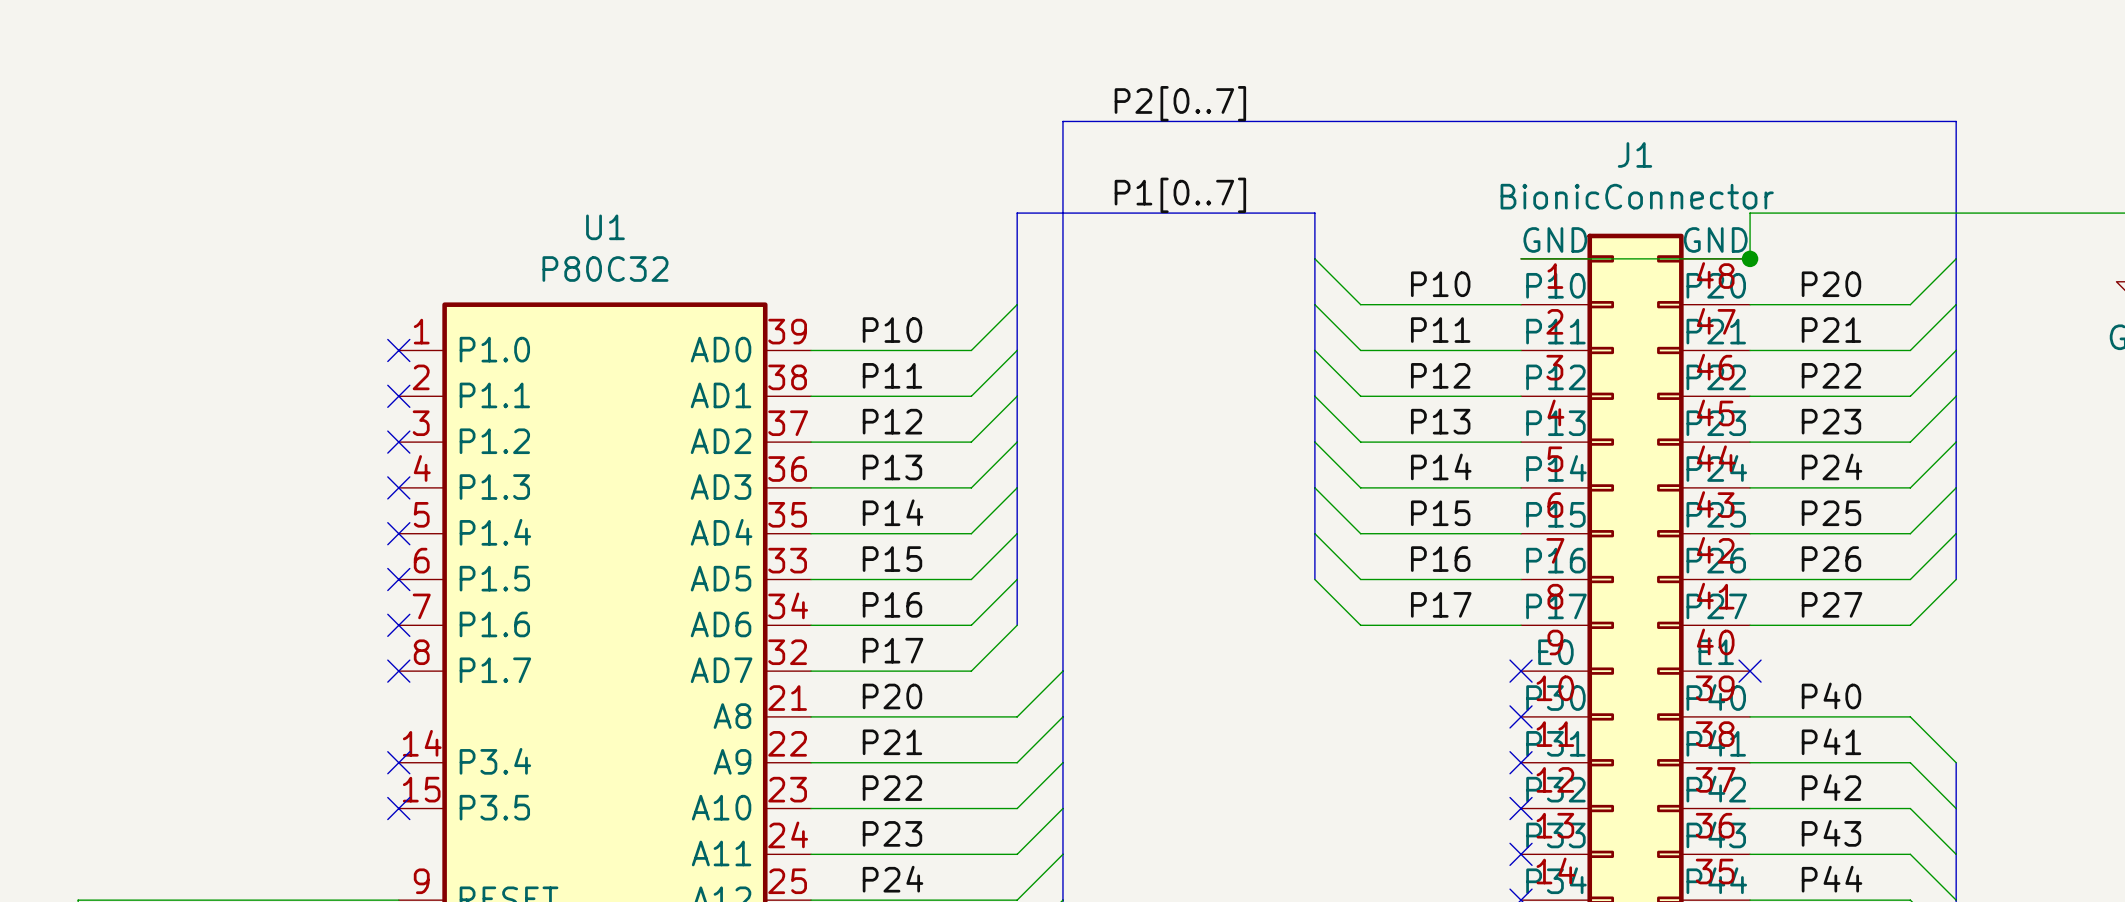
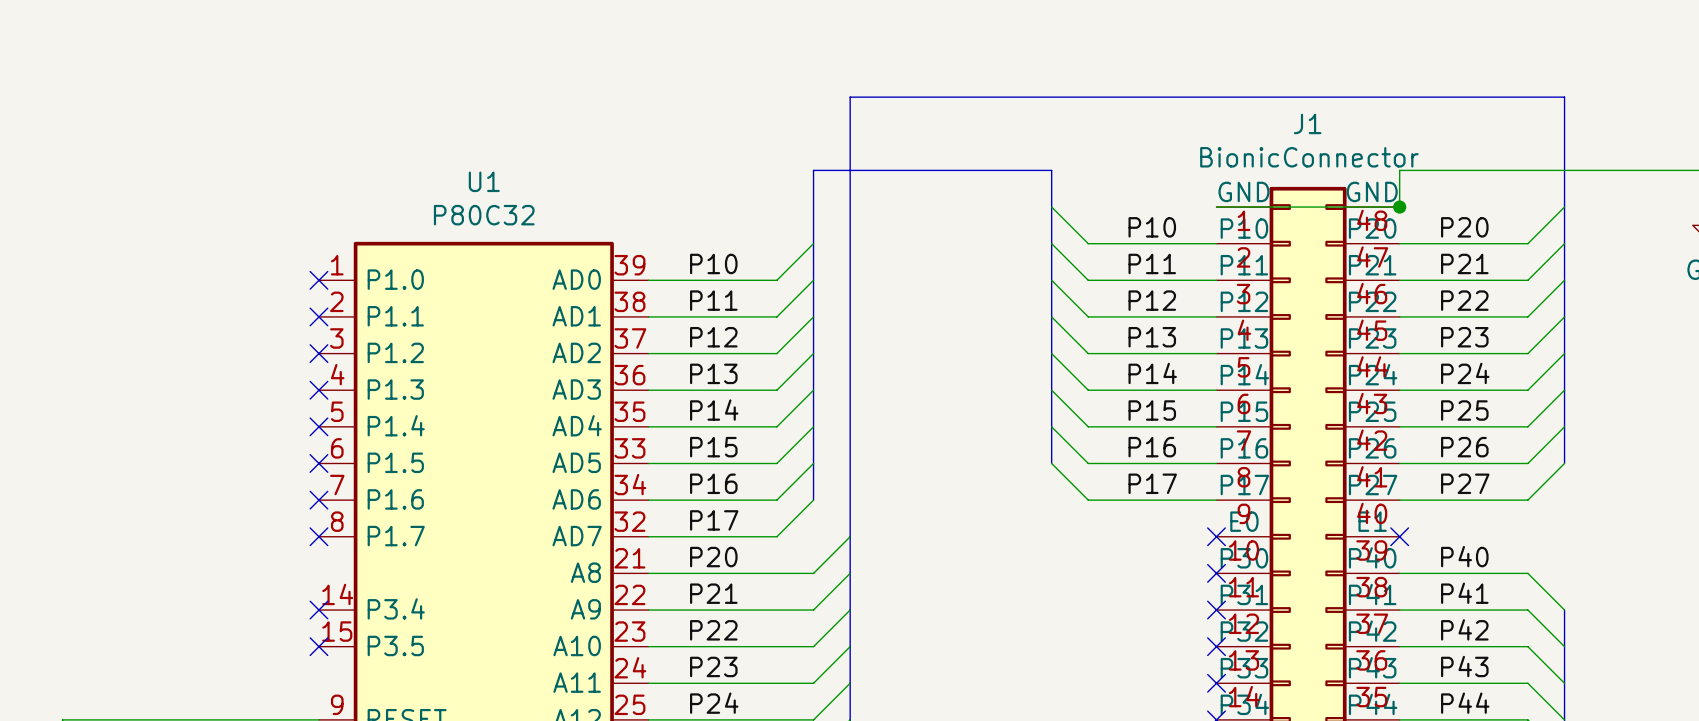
label: P2[0..7] (1180, 103) -> none
label: P1[0..7] (1180, 195) -> none

